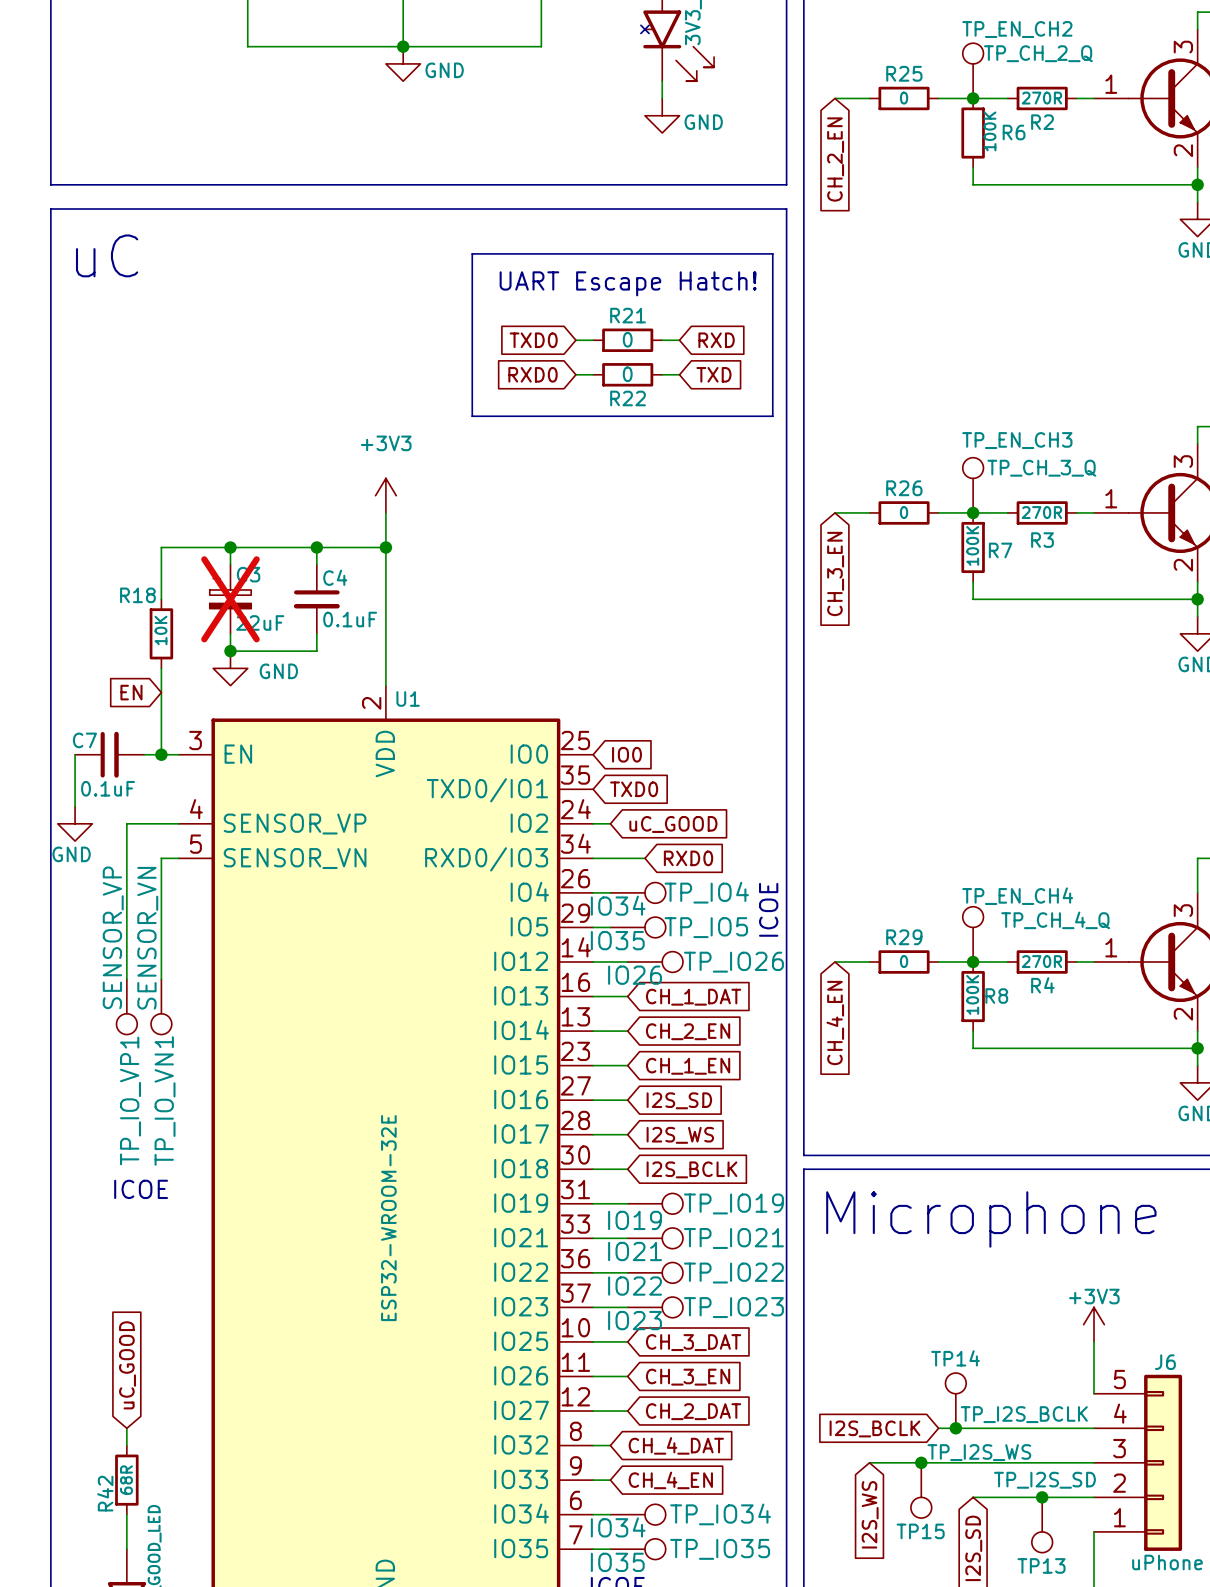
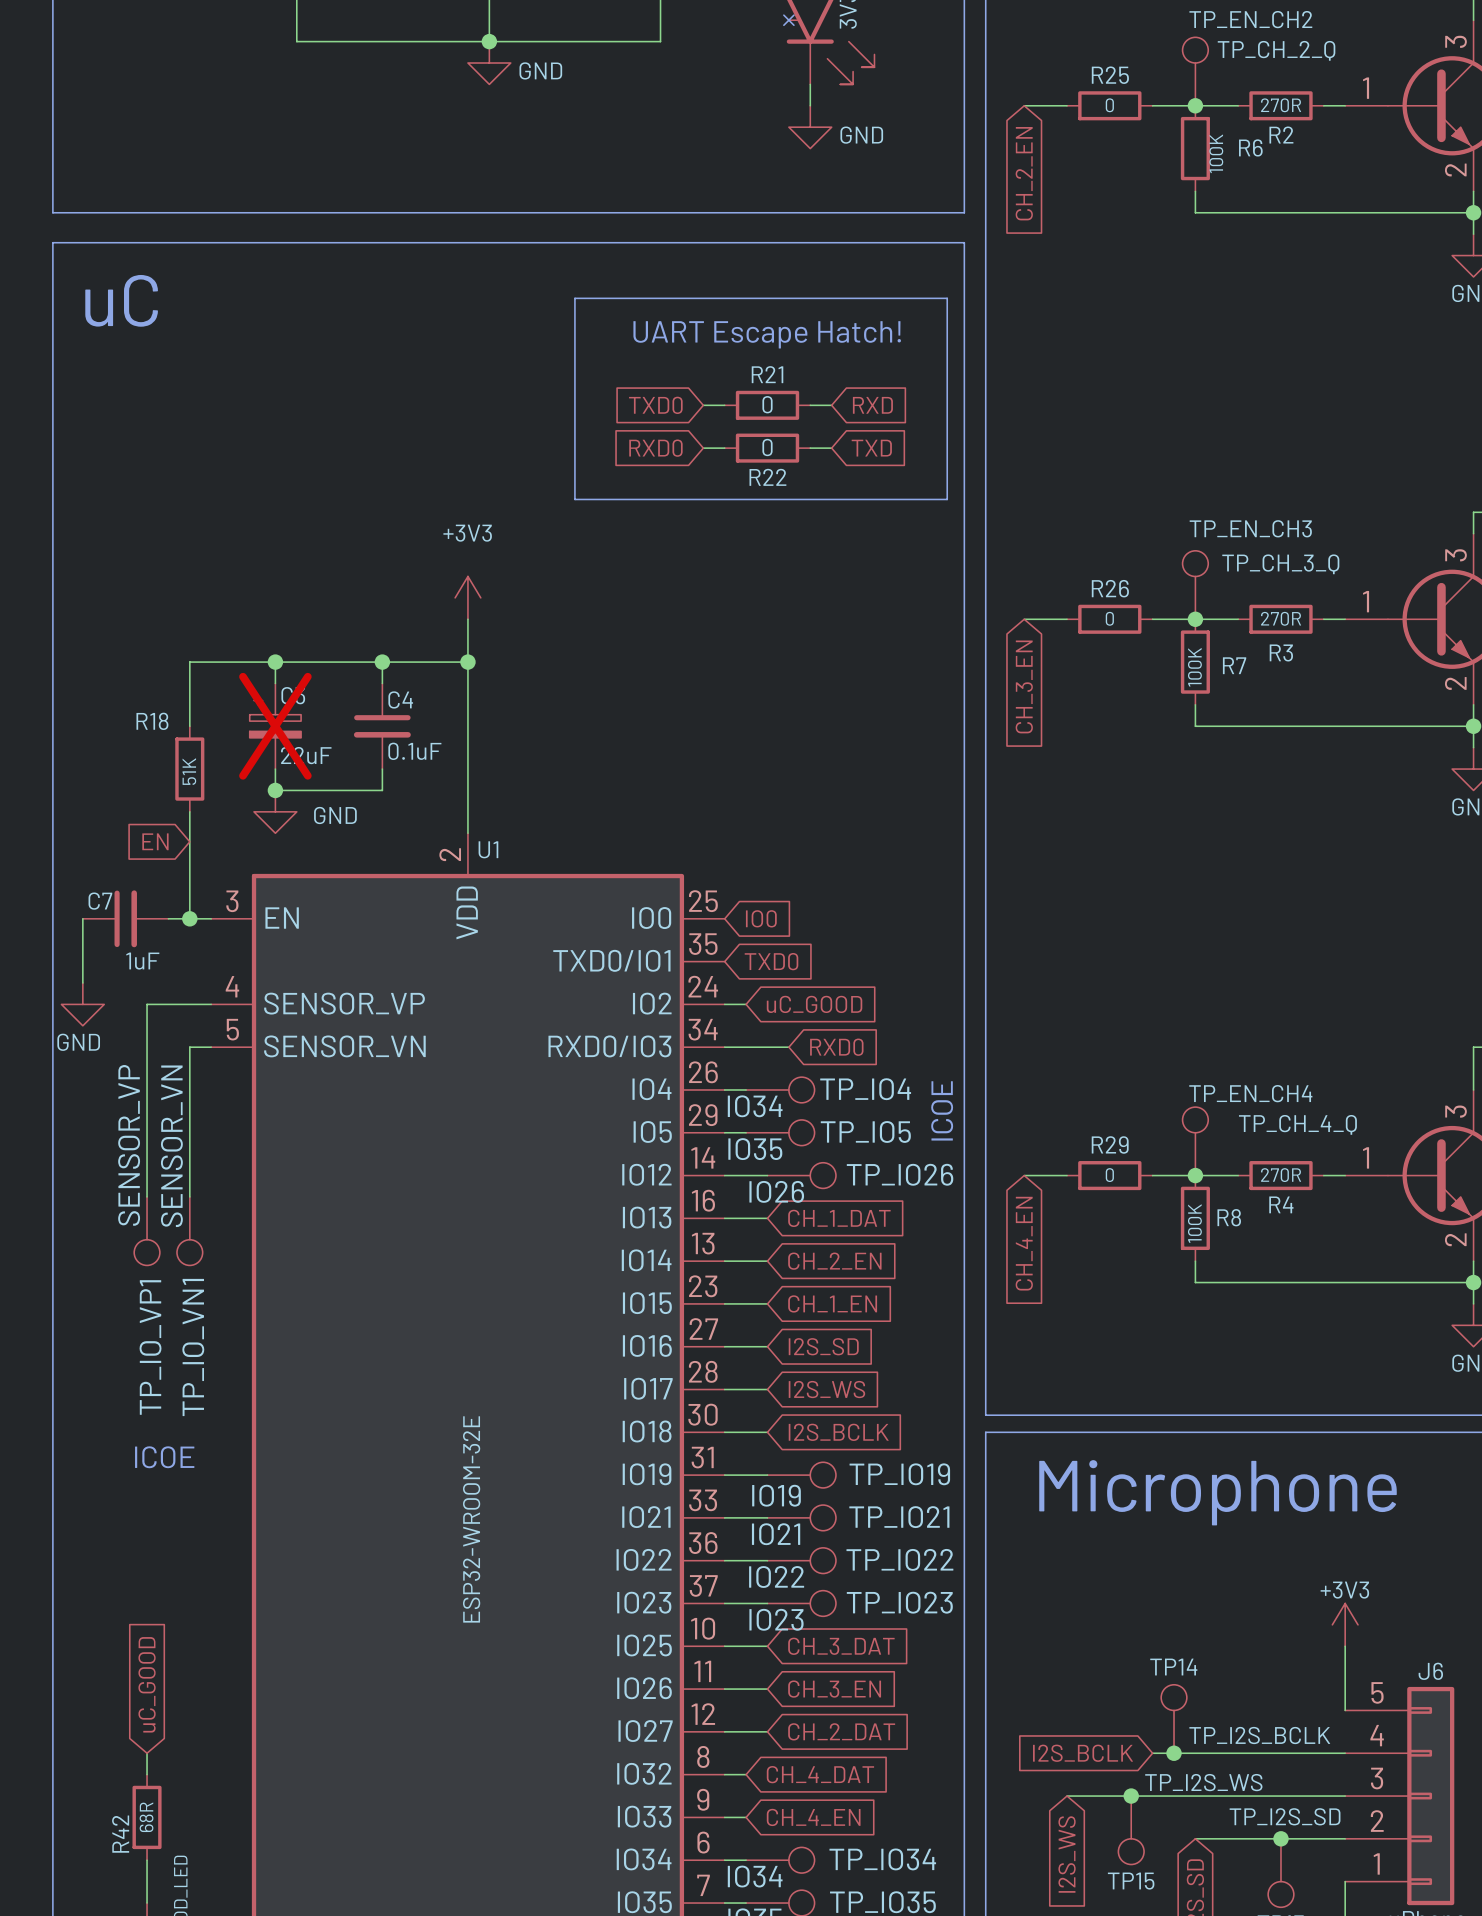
R18 value: 10K (161, 630) -> 51K (189, 771)
C7 value: 0.1uF (108, 788) -> 1uF (142, 961)

